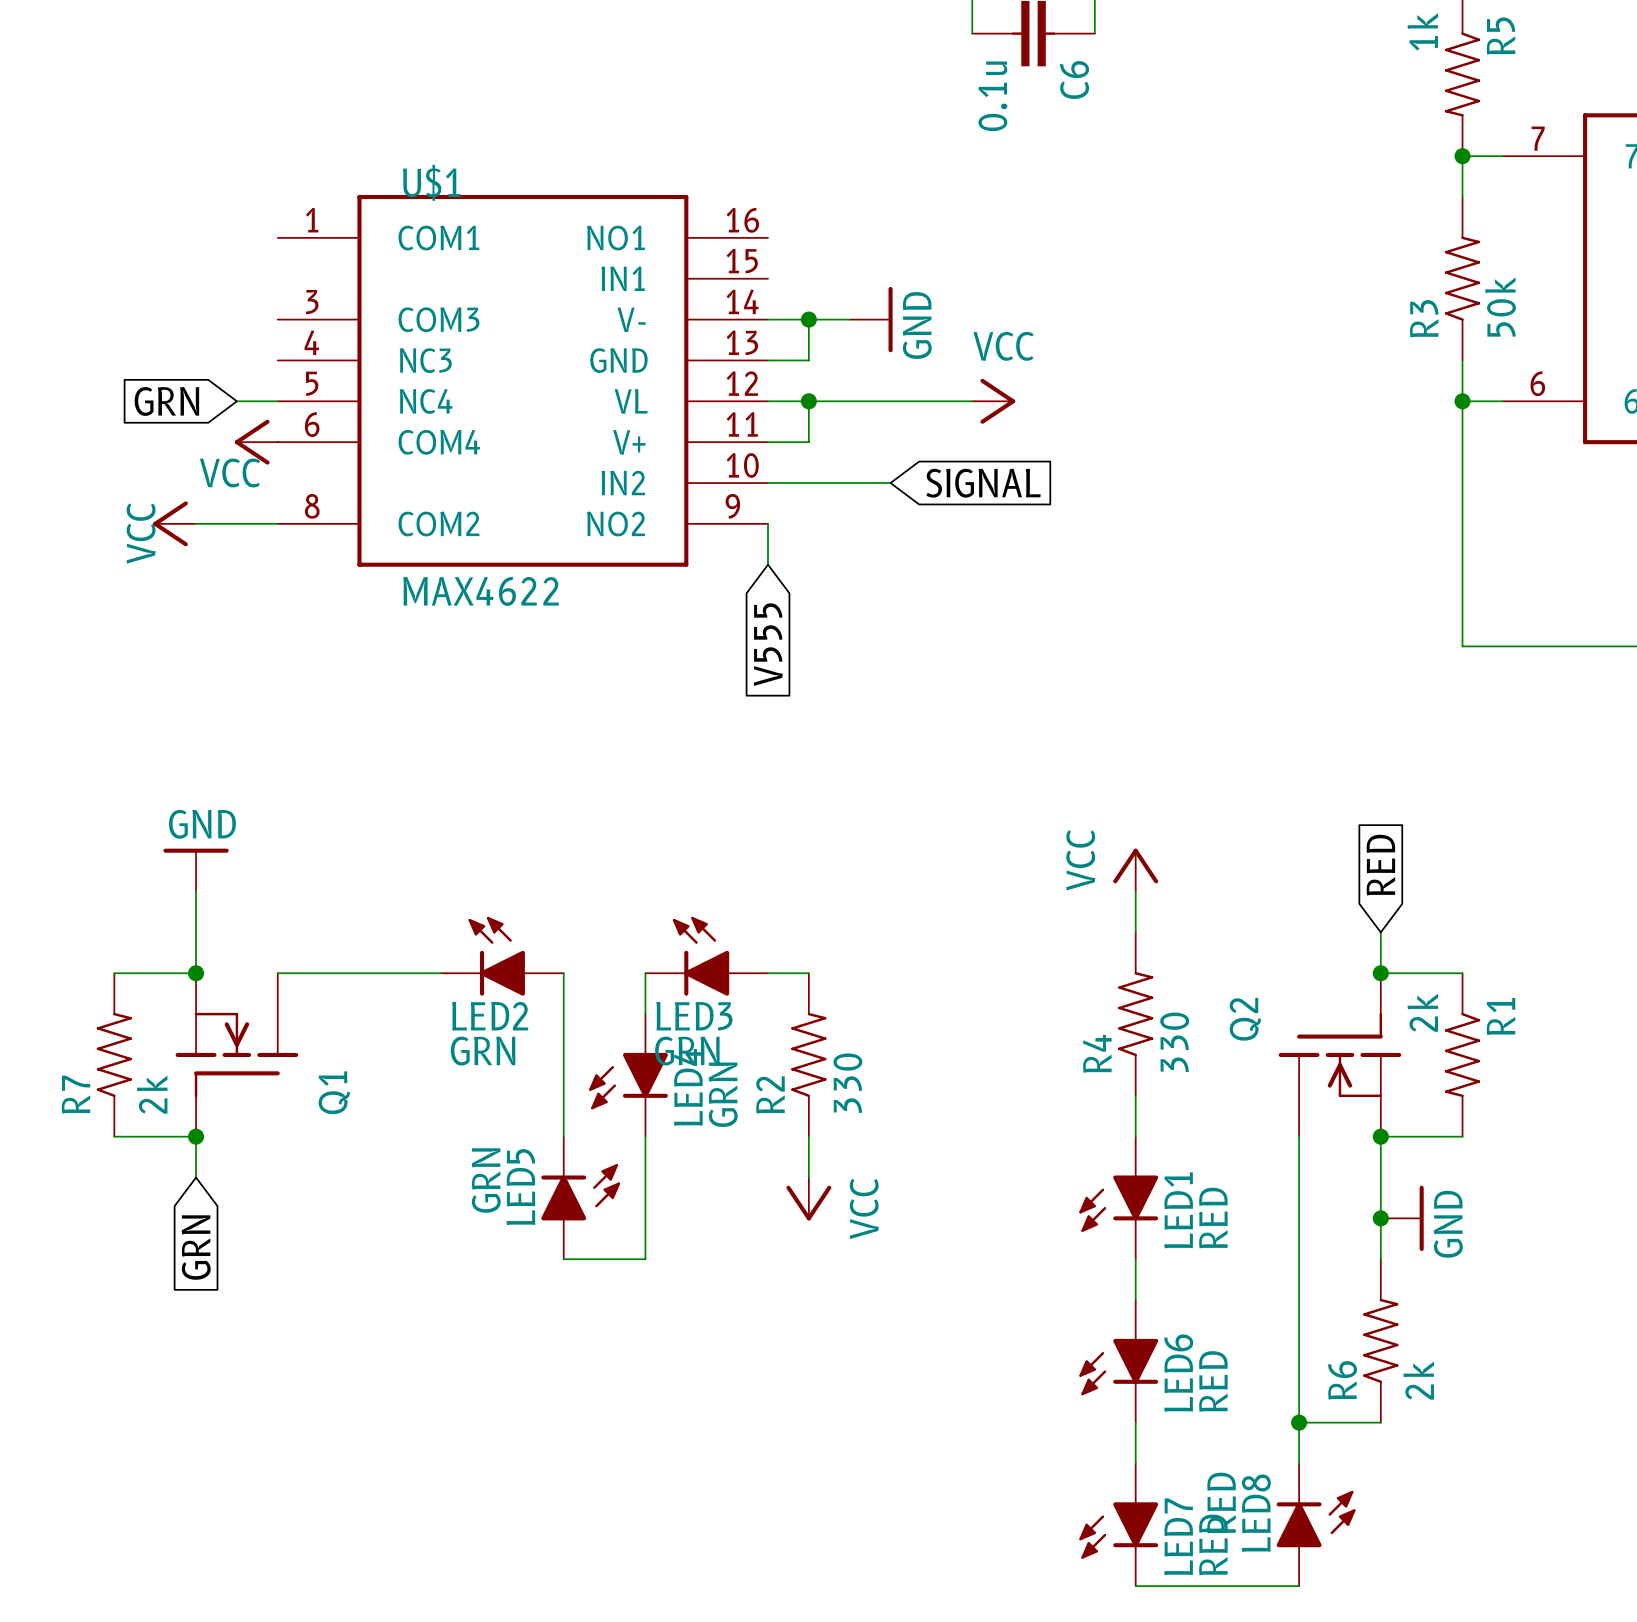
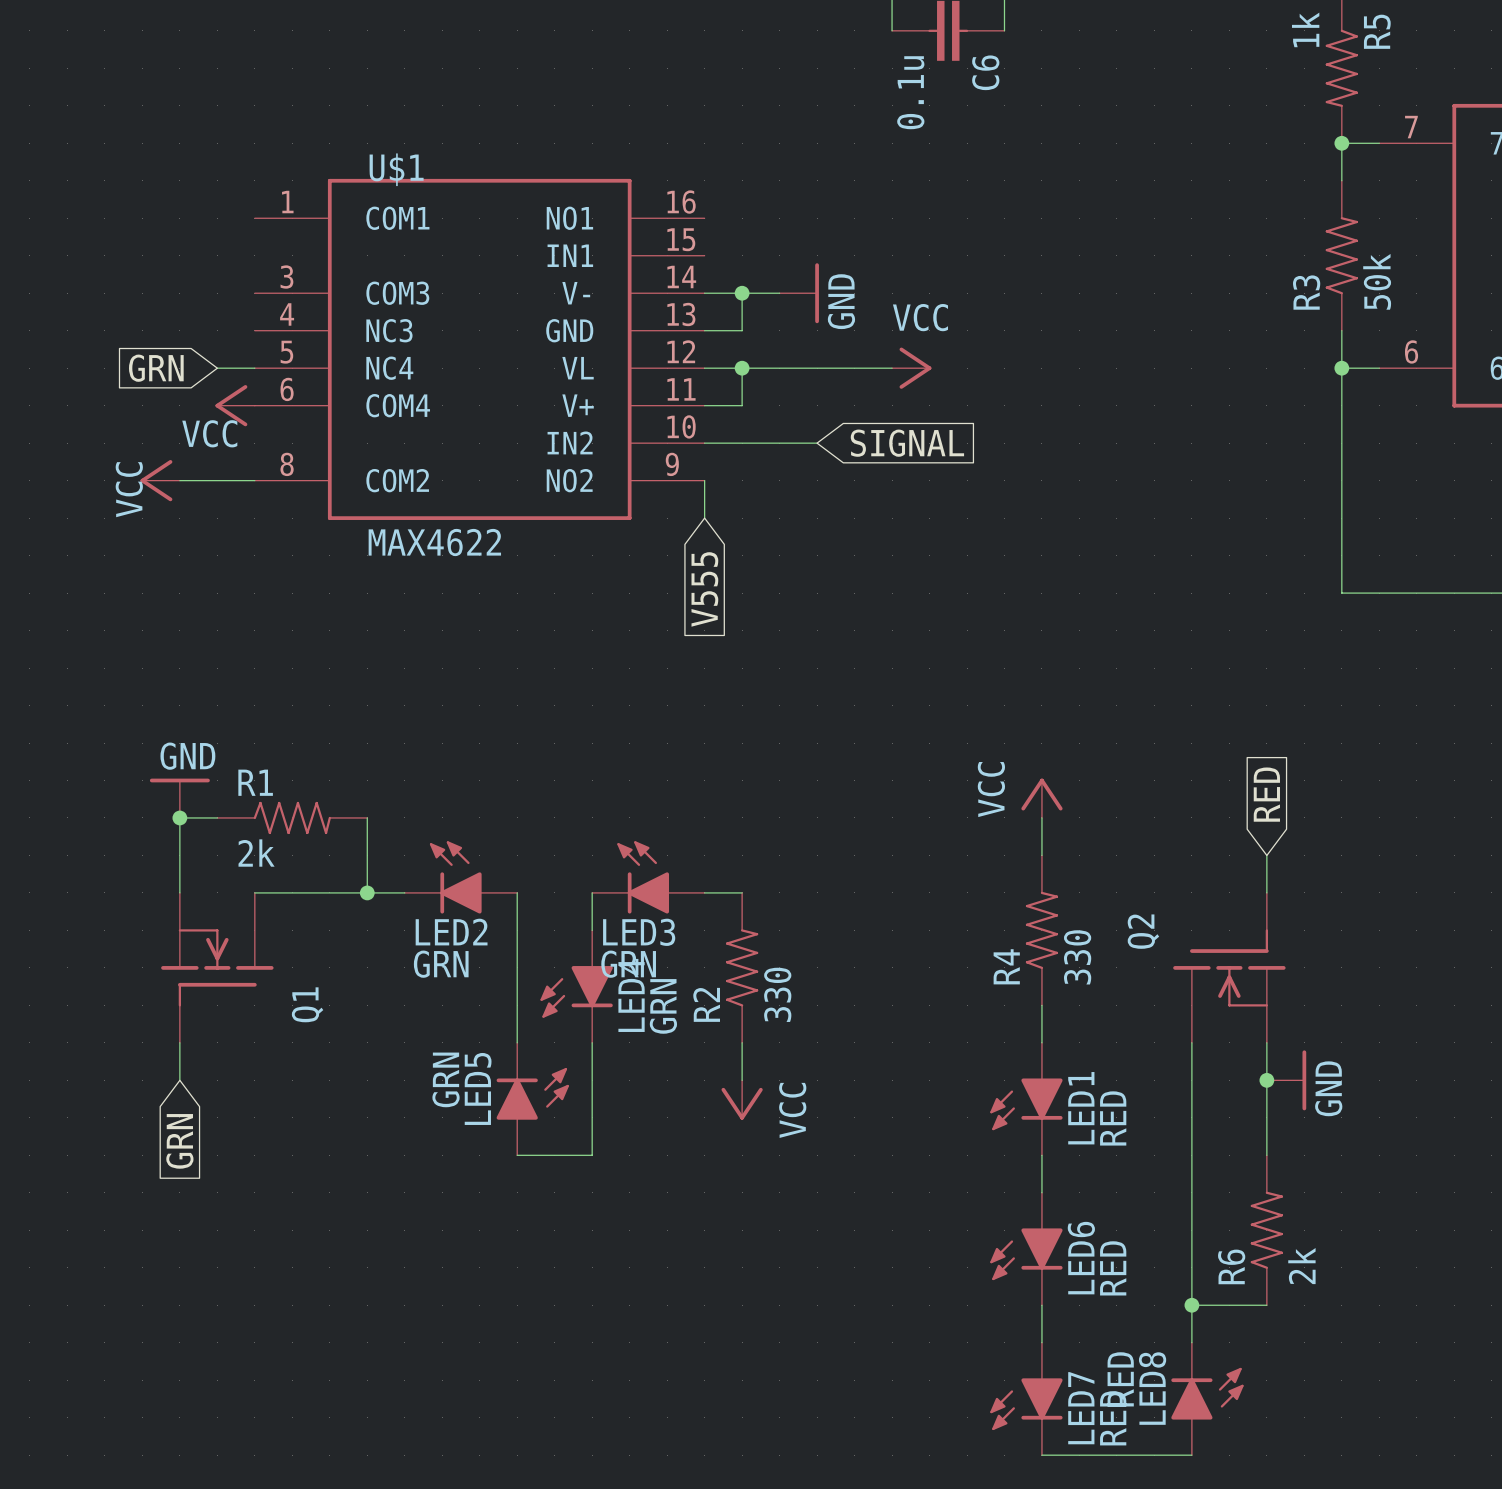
wire: none -> (179, 817) (217, 817)
wire: none -> (367, 817) (367, 892)
wire: (114, 973) (196, 973) -> none
junction position: (196, 973) -> (179, 817)
junction: none -> (367, 892)
wire: (1380, 973) (1462, 973) -> none
junction: (1380, 973) -> none
R7: 2k (114, 1054) -> none
R1 rotation: 0° (1462, 1054) -> 90° counterclockwise (292, 817)
R1 position: (1462, 1054) -> (292, 817)
wire: (114, 1136) (196, 1136) -> none
junction: (196, 1136) -> none
wire: (1380, 1136) (1462, 1136) -> none
junction: (1380, 1136) -> none
junction: none -> (1266, 1080)
junction: (1380, 1218) -> none
power symbol position: GND (1402, 1218) -> GND (1286, 1080)

